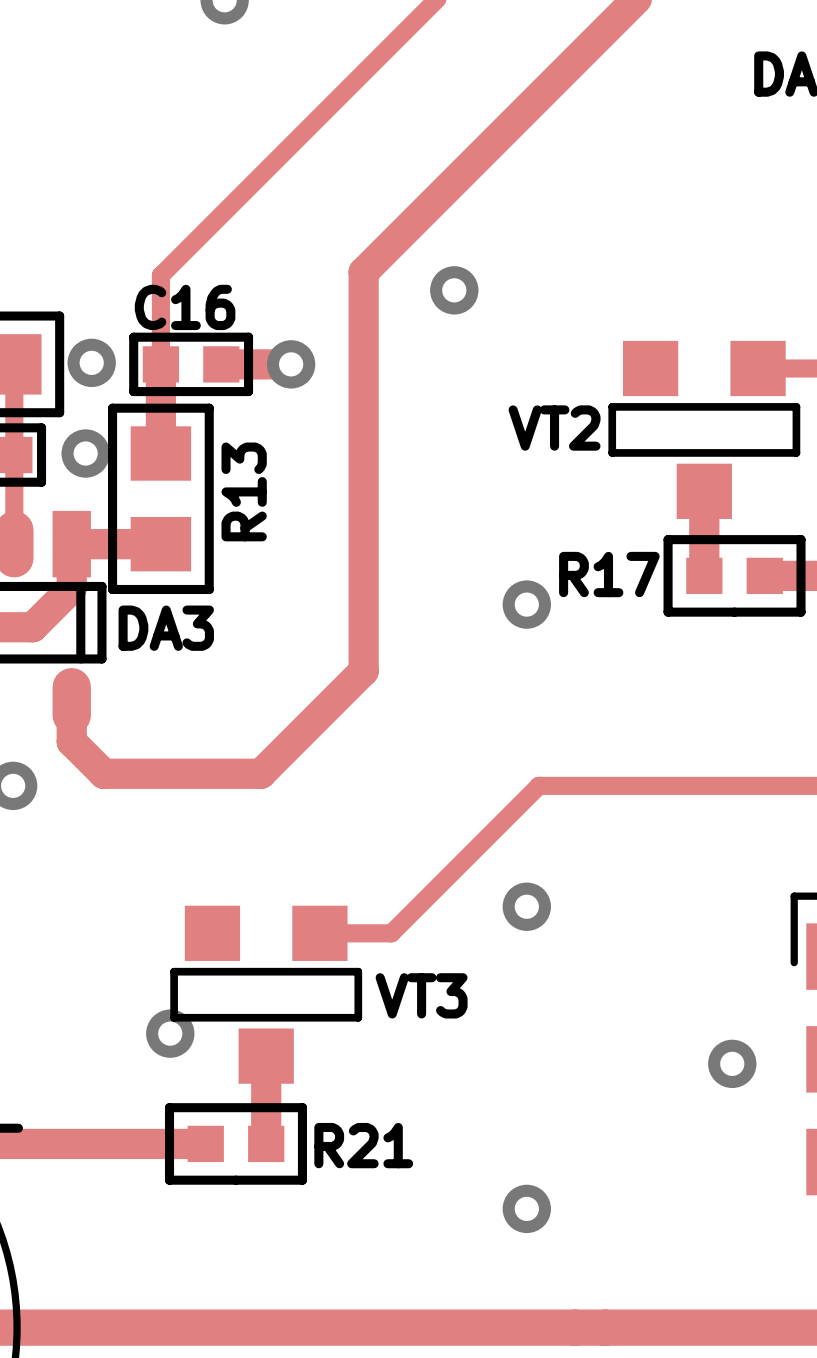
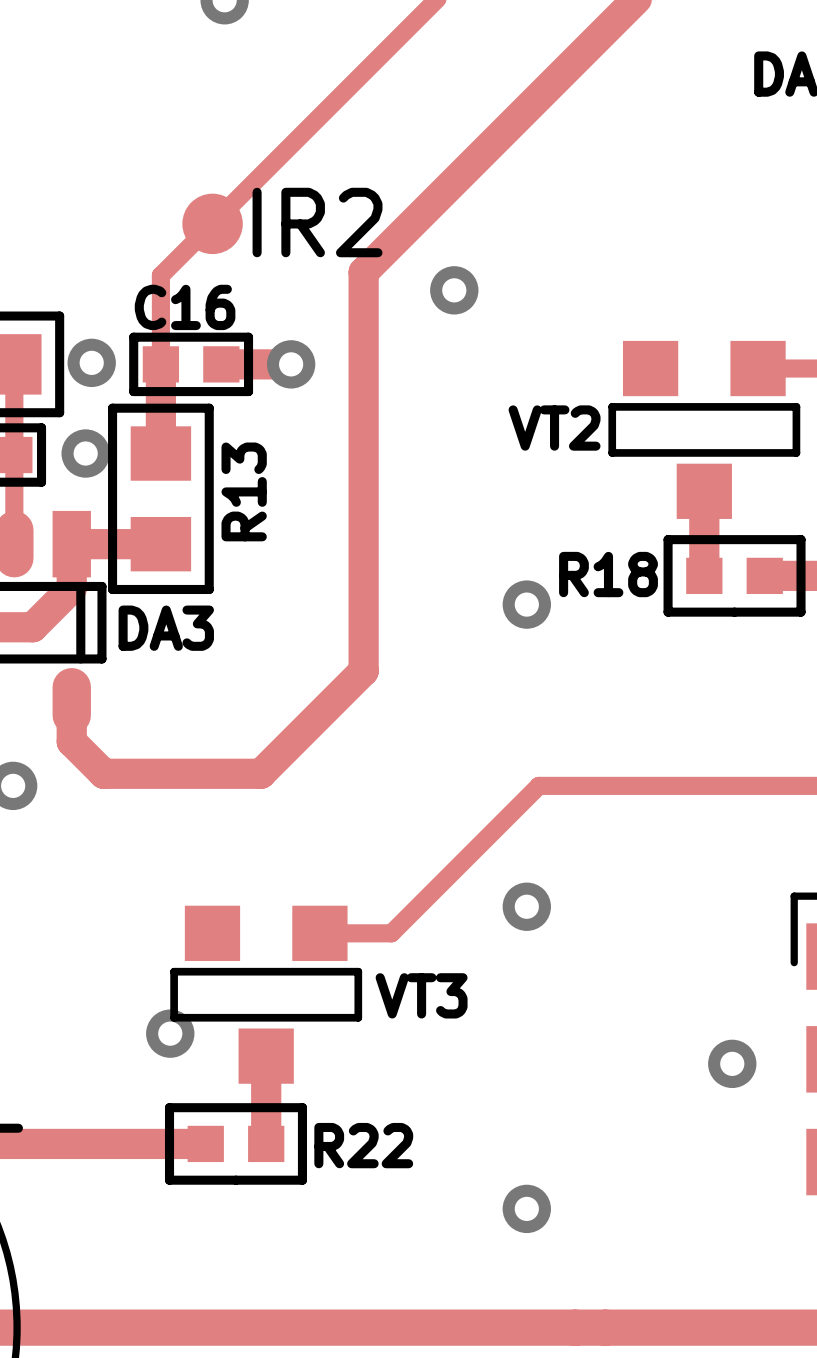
text: none -> IR2 (317, 222)
part: none -> (212, 223)
R17 name: R17 (609, 574) -> R18 (608, 574)
R21 name: R21 (363, 1145) -> R22 (363, 1145)

